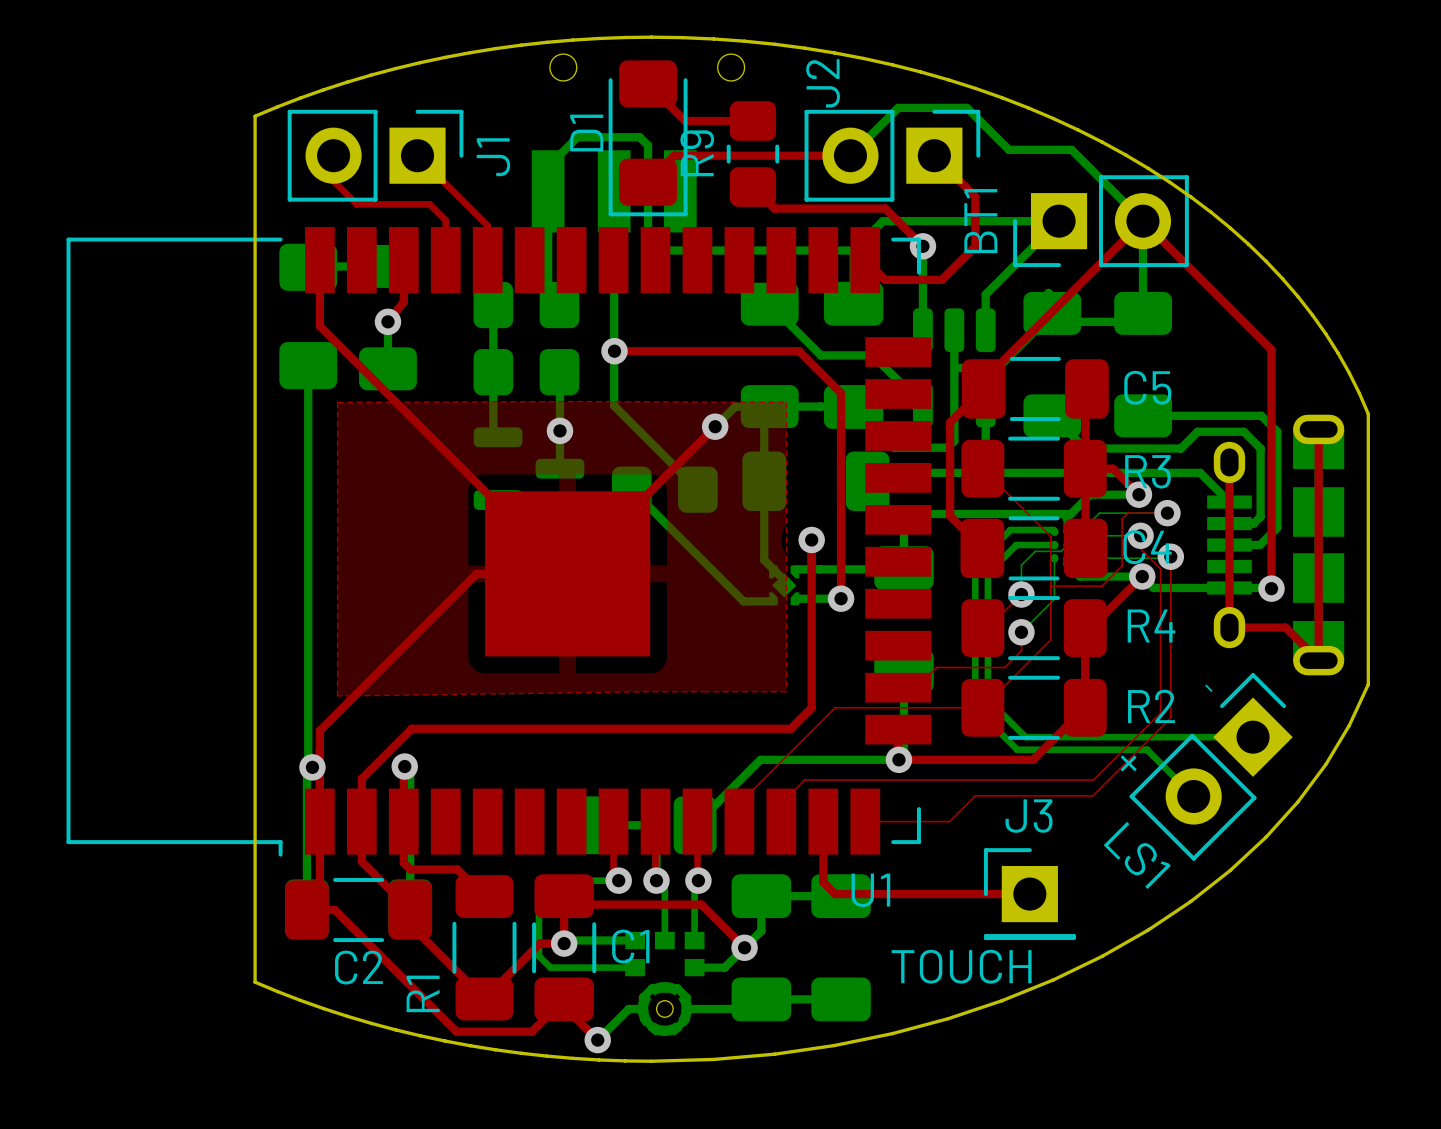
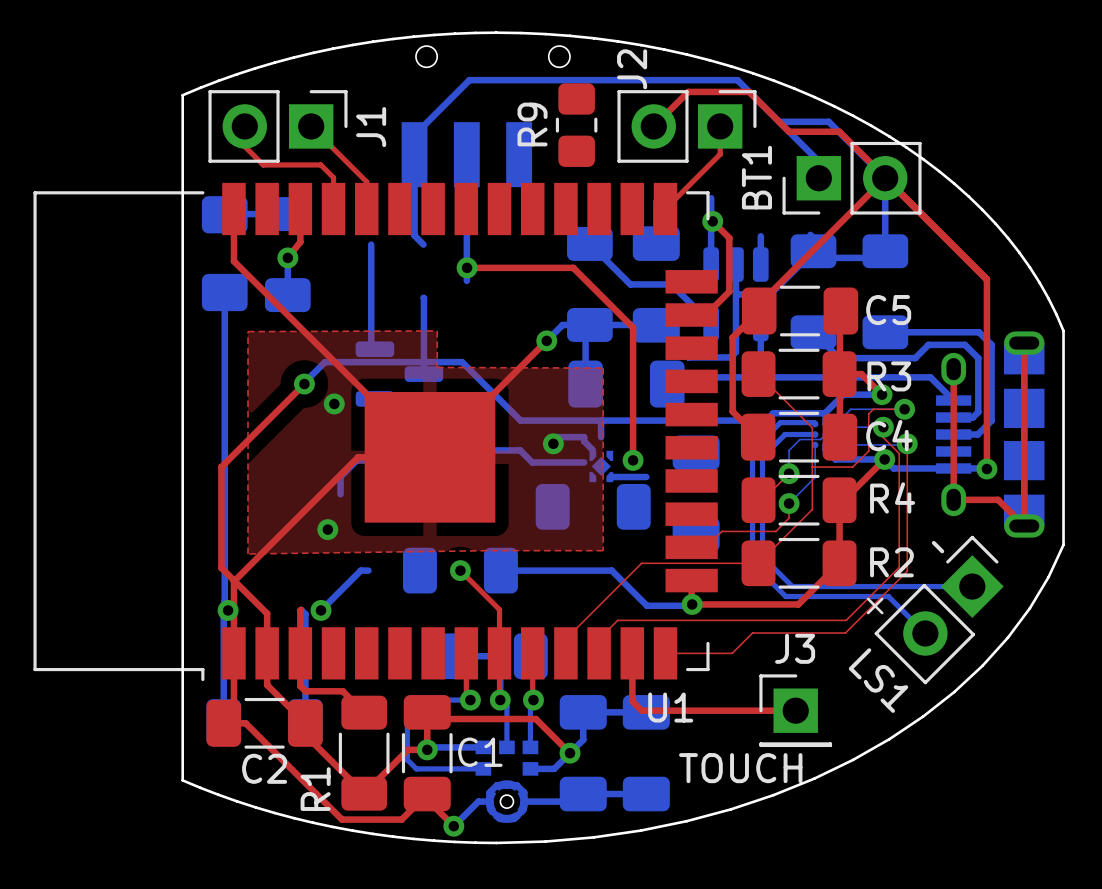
top track: (648, 83) (685, 120) (752, 120) -> none
bottom track: (966, 107) (898, 107) (850, 155) -> none
bottom track: (577, 137) (639, 137) (648, 145) (648, 237) (660, 250) (853, 250) (883, 221) (1059, 221) (985, 294) -> (437, 111) (469, 80) (737, 80) (745, 88)
D1: (648, 138) -> none
top track: (850, 155) (674, 155) (648, 182) -> (653, 126) (688, 91) (749, 91) (789, 131) (839, 131) (986, 279)
top track: (934, 155) (975, 196) (975, 246) (941, 279) (885, 279) (865, 260) -> (720, 126) (720, 154) (665, 209)
top track: (752, 187) (774, 208) (885, 208) (922, 246) -> none
via position: (922, 246) -> (712, 221)
top track: none -> (712, 221) (729, 237) (729, 291) (706, 315) (691, 315)
part: (526, 305) -> none
top track: none -> (467, 267) (573, 267) (633, 327) (633, 460)
bottom track: (614, 351) (614, 405) (697, 489) -> none
top track: (614, 351) (799, 351) (841, 393) (841, 598) -> none
via position: (614, 351) -> (467, 267)
part: (526, 372) -> none
top zone outline: (337, 414) (337, 402) (786, 402) (786, 461) -> (248, 331) (437, 330) (437, 367) (603, 368)
via: (559, 430) -> none
bottom track: none -> (304, 384) (325, 362) (462, 362) (520, 420) (766, 420) (773, 413) (824, 413)
via: none -> (304, 384)
bottom track: (764, 481) (764, 560) (784, 580) (784, 585) -> none
part: (664, 489) -> none
bottom track: (498, 500) (621, 500) (631, 489) (743, 601) (773, 601) -> none
via: none -> (334, 403)
bottom track: (1070, 513) (917, 513) (903, 527) (902, 569) (794, 569) -> none
bottom track: none -> (601, 420) (601, 437)
top track: (811, 539) (811, 707) (790, 728) (411, 728) (361, 778) -> (304, 384) (221, 467) (221, 567) (267, 613) (267, 619)
via: (811, 539) -> none
bottom track: none -> (553, 443) (556, 437) (584, 437) (584, 441) (592, 449)
via: none -> (553, 443)
bottom track: none -> (584, 462) (532, 462) (520, 450) (417, 450) (407, 460) (356, 460) (340, 476) (340, 494)
via position: (841, 598) -> (633, 460)
part: none -> (593, 506)
via: none -> (327, 529)
bottom track: (903, 671) (903, 754) (898, 759) (760, 759) (695, 825) -> none
bottom track: none -> (368, 570) (360, 570) (321, 610)
top track: none -> (460, 570) (499, 609) (499, 653)
part: none -> (460, 570)
via: none -> (460, 570)
bottom track: none -> (500, 570) (611, 570) (647, 605) (692, 604)
via position: (404, 766) -> (321, 610)

